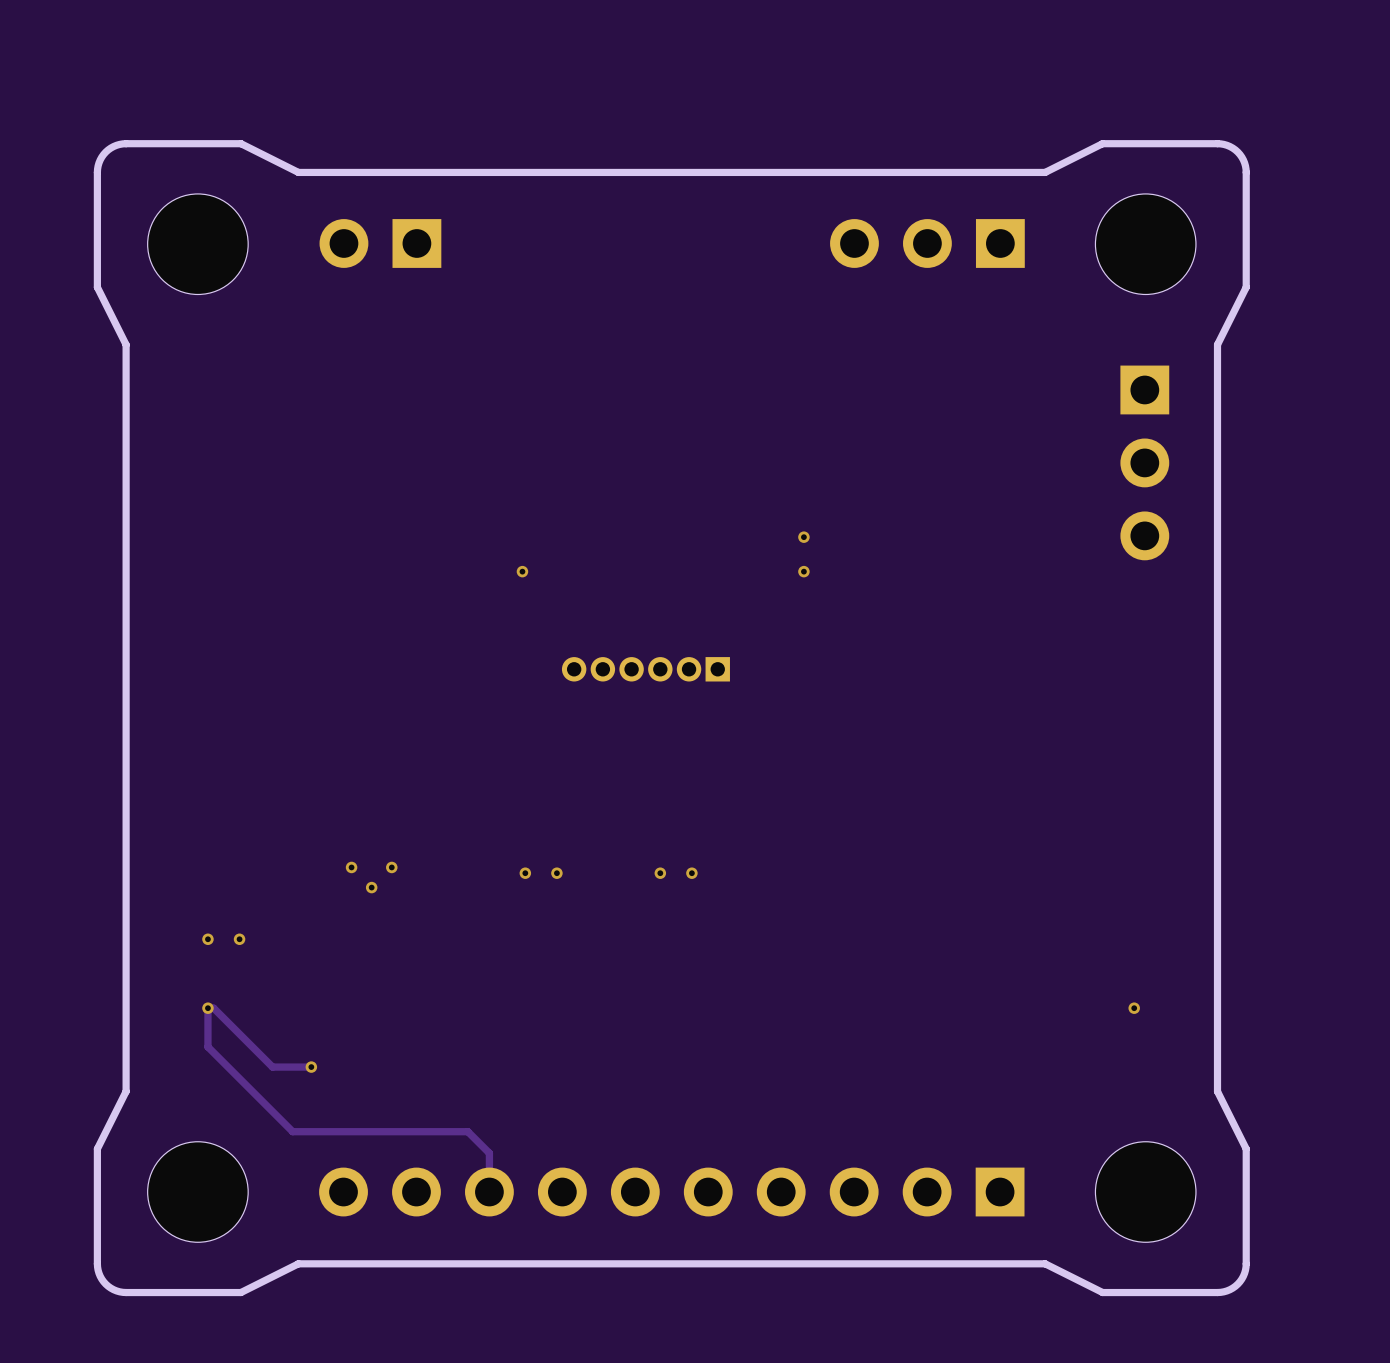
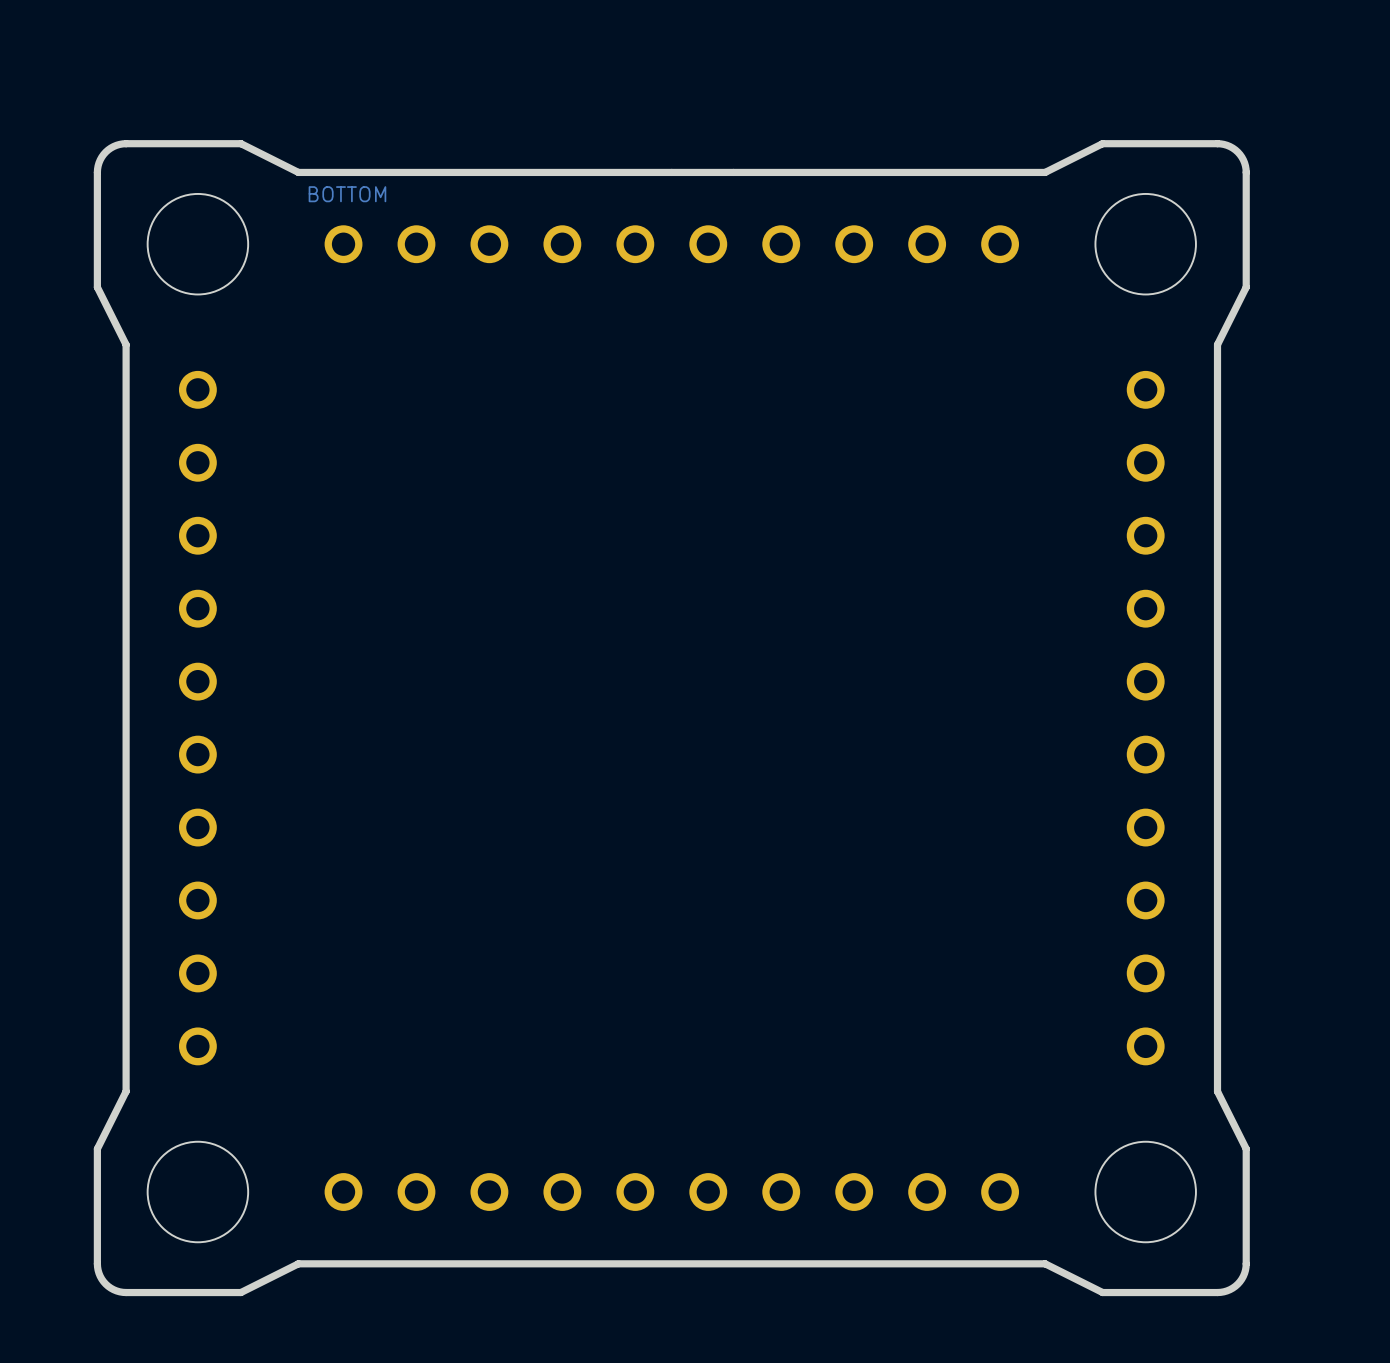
text: none -> BOTTOM (347, 194)
part: (380, 243) -> none
part: (927, 243) -> none
part: none -> (671, 244)
part: (1144, 462) -> none
via: (803, 537) -> none
via: (522, 571) -> none
via: (803, 571) -> none
part: (645, 669) -> none
part: none -> (197, 718)
part: none -> (1145, 718)
via: (351, 867) -> none
via: (391, 867) -> none
via: (525, 873) -> none
via: (556, 873) -> none
via: (660, 873) -> none
via: (691, 873) -> none
via: (371, 887) -> none
via: (207, 939) -> none
via: (239, 939) -> none
via: (207, 1008) -> none
via: (1134, 1008) -> none
track: (311, 1067) (272, 1067) (213, 1008) (207, 1008) (207, 1046) (292, 1131) (467, 1131) (489, 1153) (489, 1192) -> none
via: (311, 1067) -> none
part footprint: [319, 1167, 1025, 1217] -> [324, 1173, 1020, 1211]

